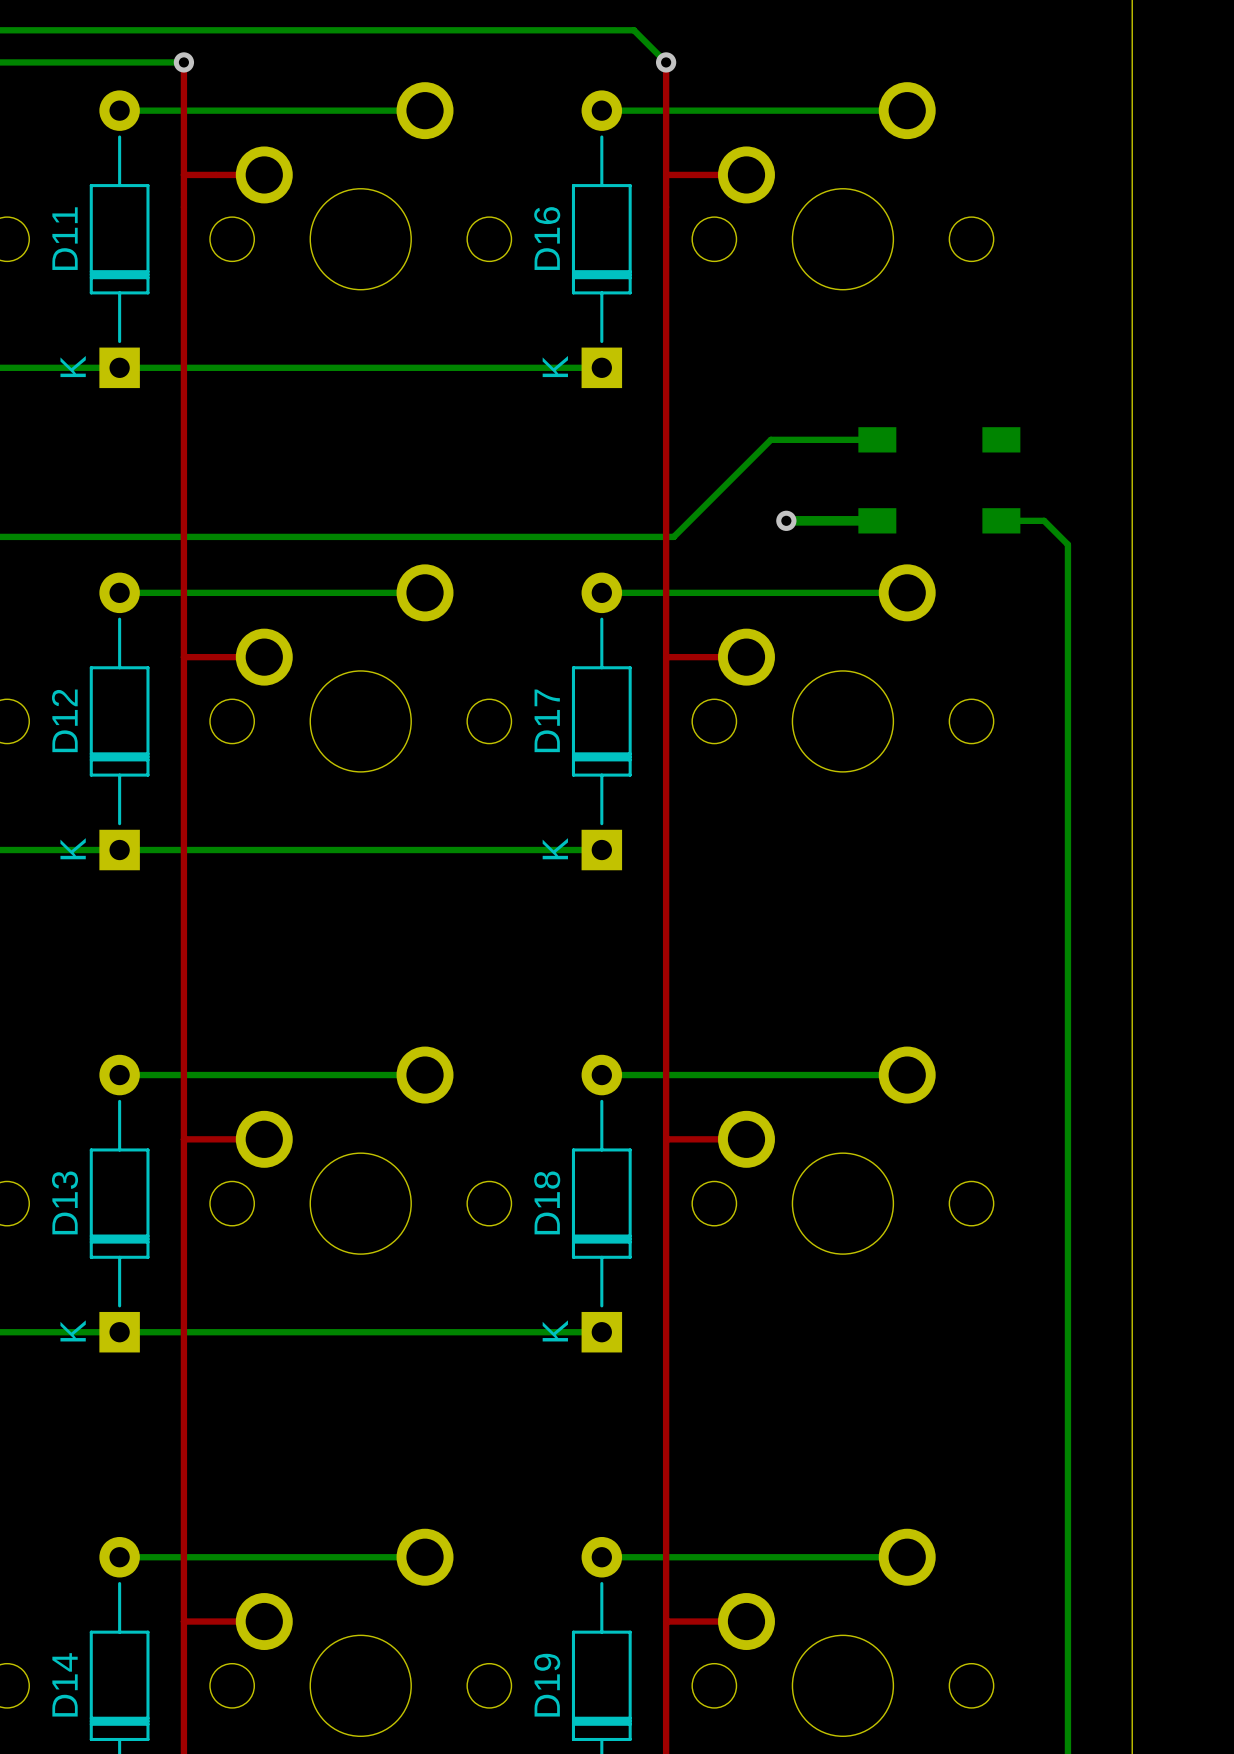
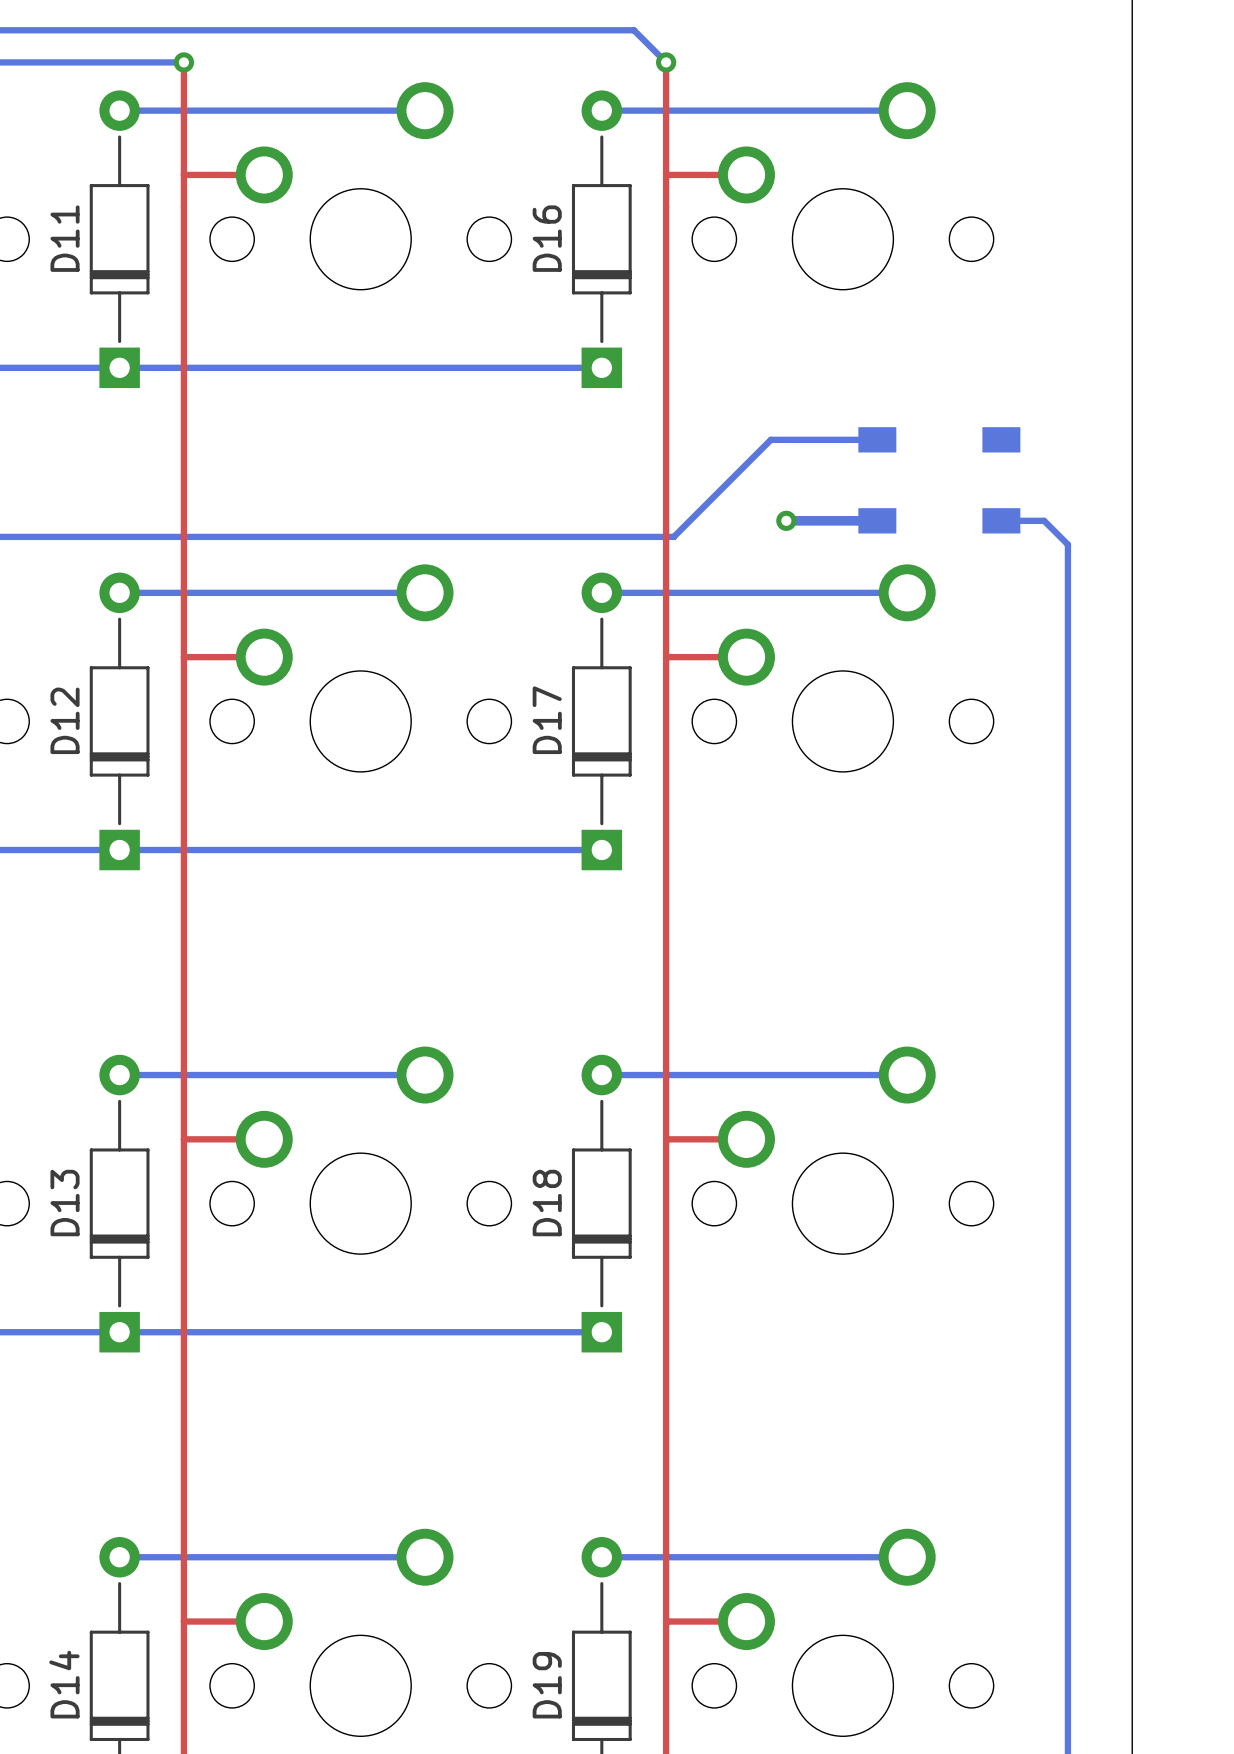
D11 text: K (73, 366) -> none
D16 text: K (555, 366) -> none
D12 text: K (73, 848) -> none
D17 text: K (555, 848) -> none
D13 text: K (73, 1330) -> none
D18 text: K (555, 1330) -> none

